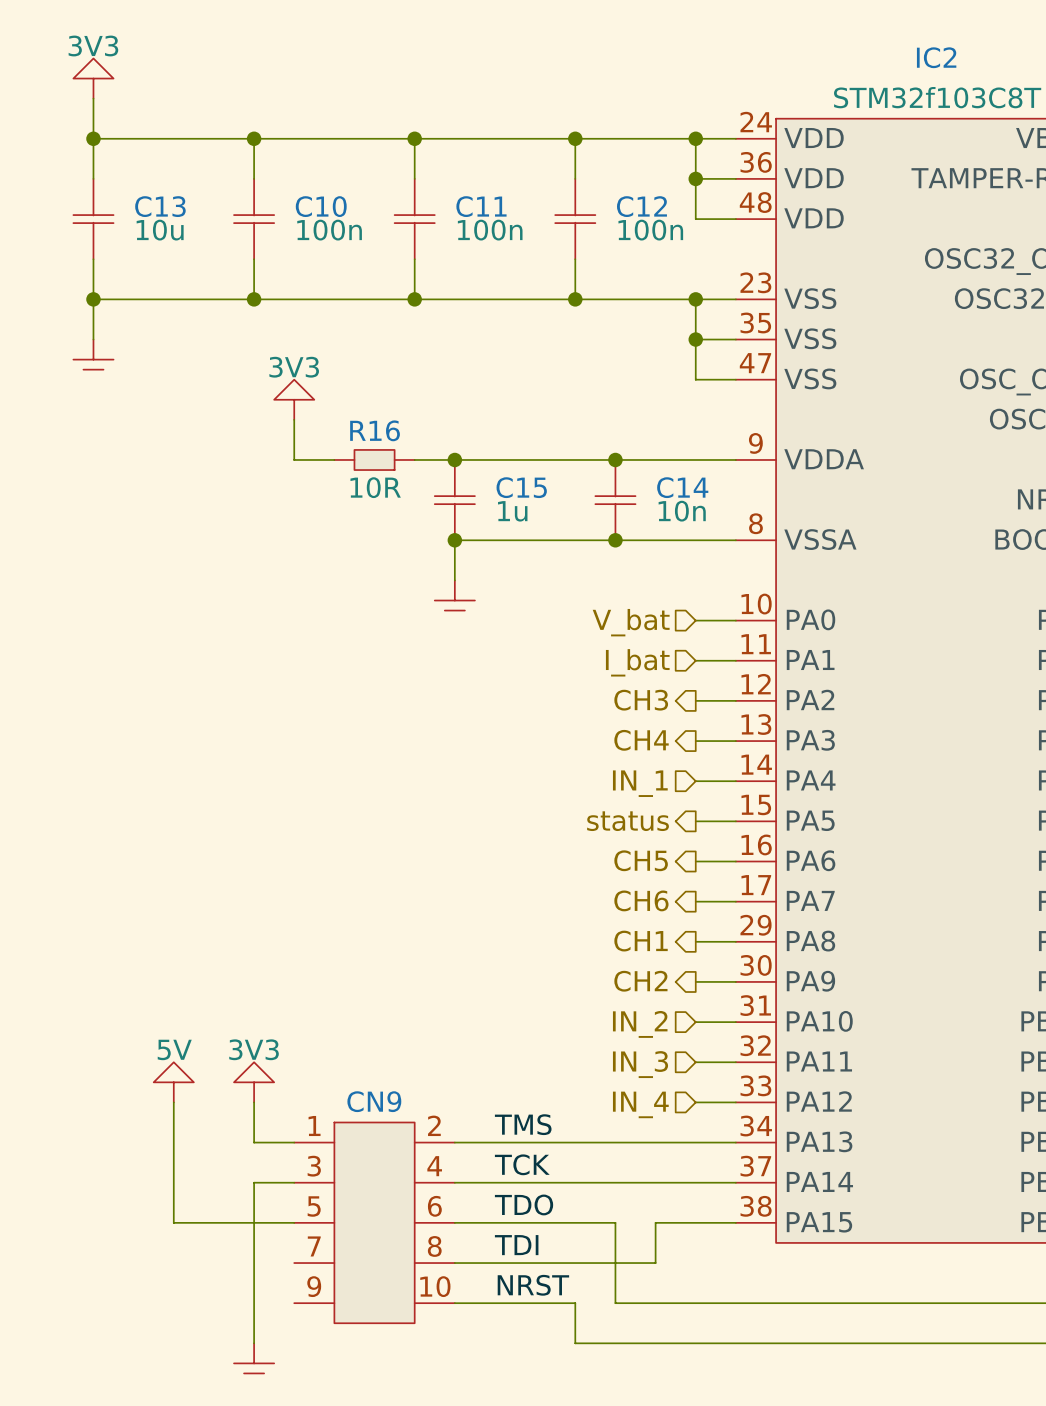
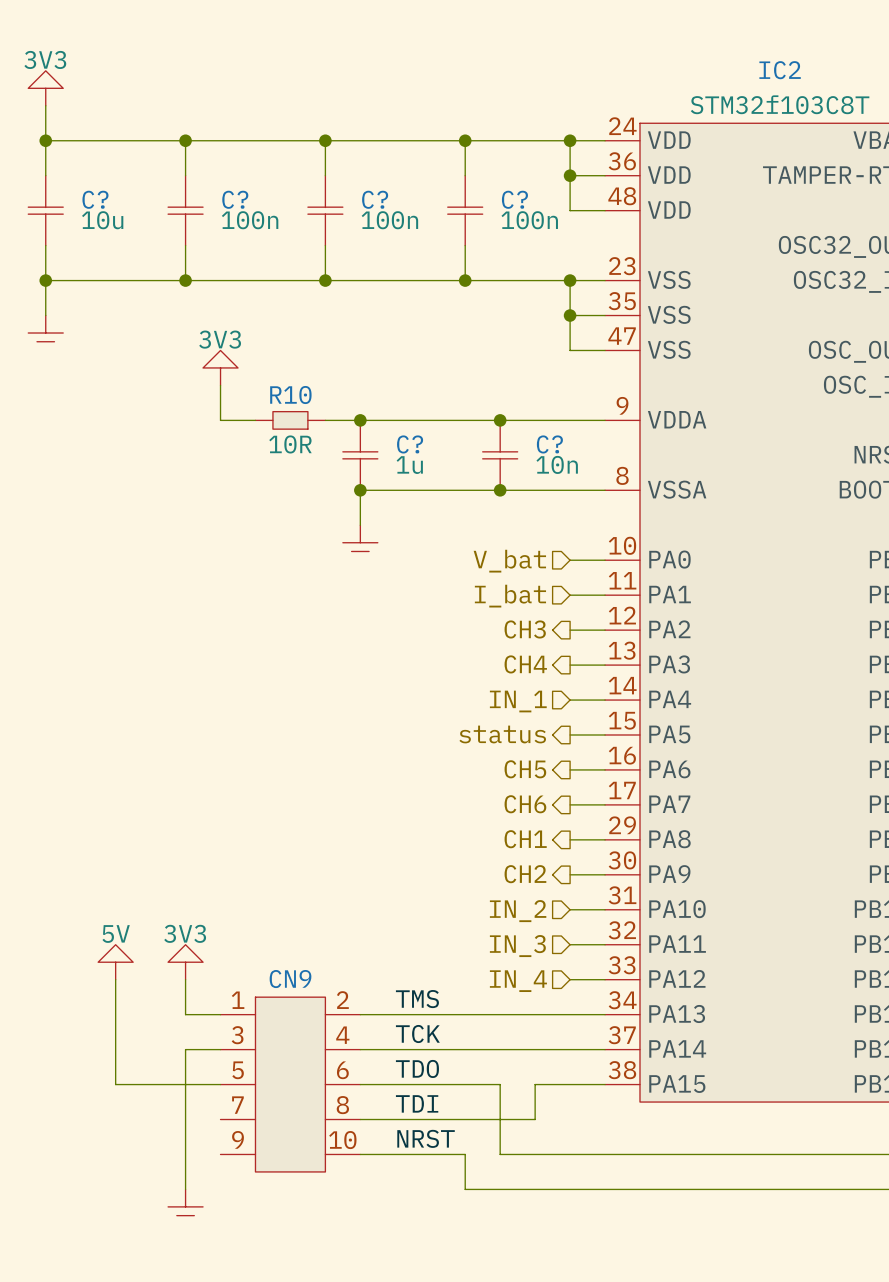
C13 name: C13 (160, 206) -> C? (95, 199)
C10 name: C10 (321, 206) -> C? (235, 199)
C11 name: C11 (481, 206) -> C? (375, 199)
C12 name: C12 (641, 206) -> C? (514, 199)
R16 name: R16 (375, 430) -> R10 (290, 395)
C15 name: C15 (521, 487) -> C? (410, 444)
C14 name: C14 (682, 487) -> C? (549, 444)

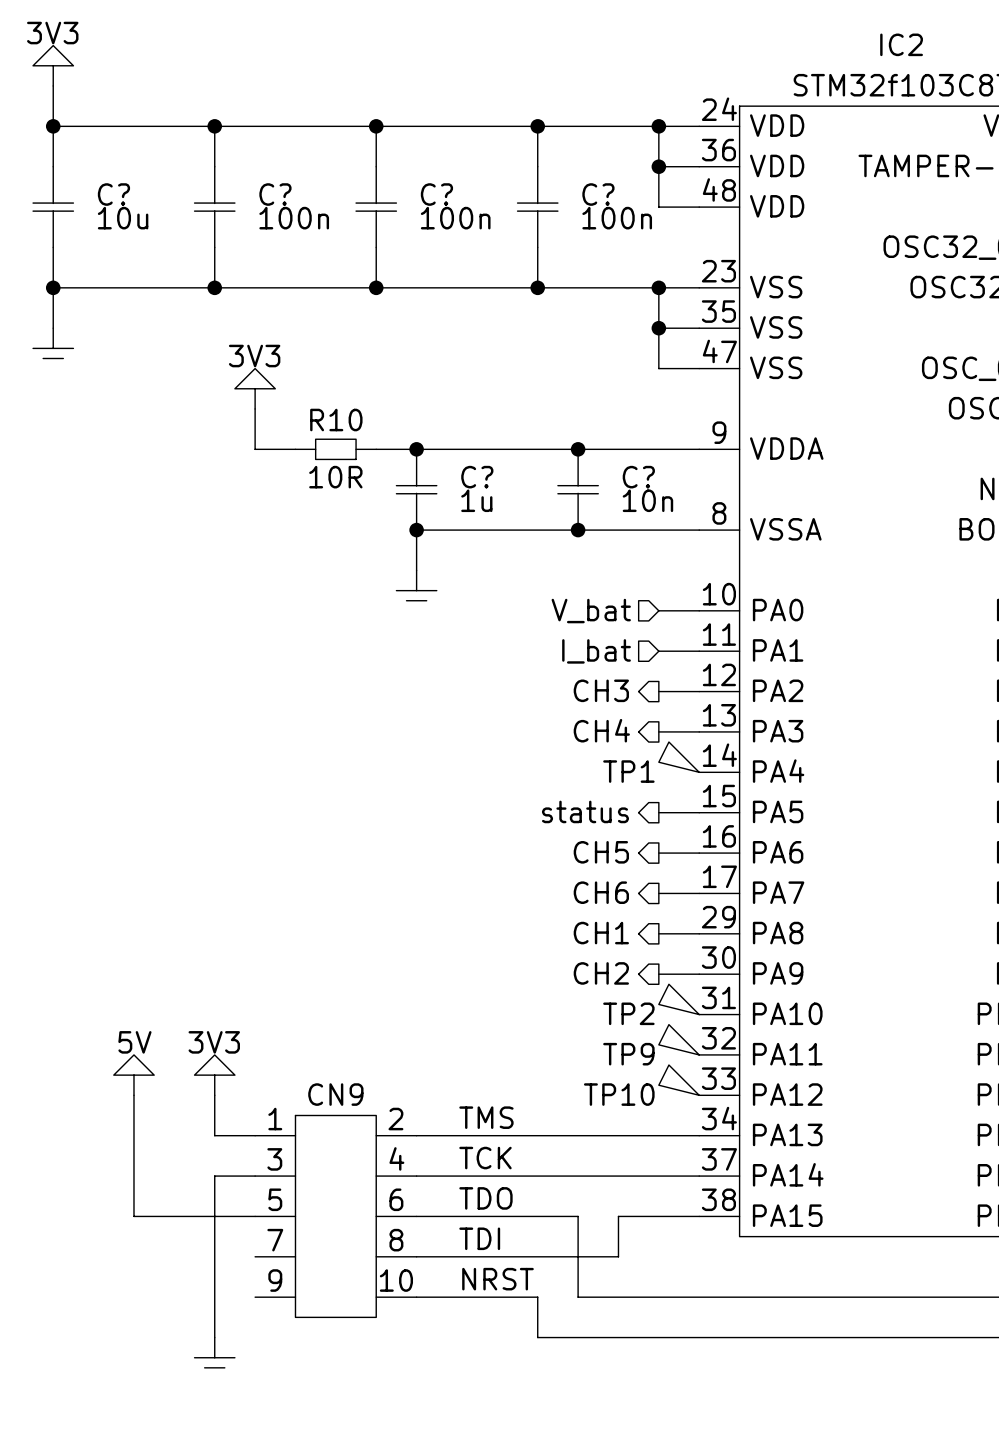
TP1: none -> (679, 757)
wire: (570, 700) (605, 700) -> none
hierarchical label: IN_1 (518, 701) -> none
TP2: none -> (679, 999)
wire: (570, 909) (605, 909) -> none
hierarchical label: IN_2 (518, 911) -> none
TP9: none -> (679, 1039)
wire: (570, 944) (605, 944) -> none
hierarchical label: IN_3 (517, 946) -> none
TP10: none -> (679, 1080)
wire: (570, 979) (605, 979) -> none
hierarchical label: IN_4 (518, 981) -> none

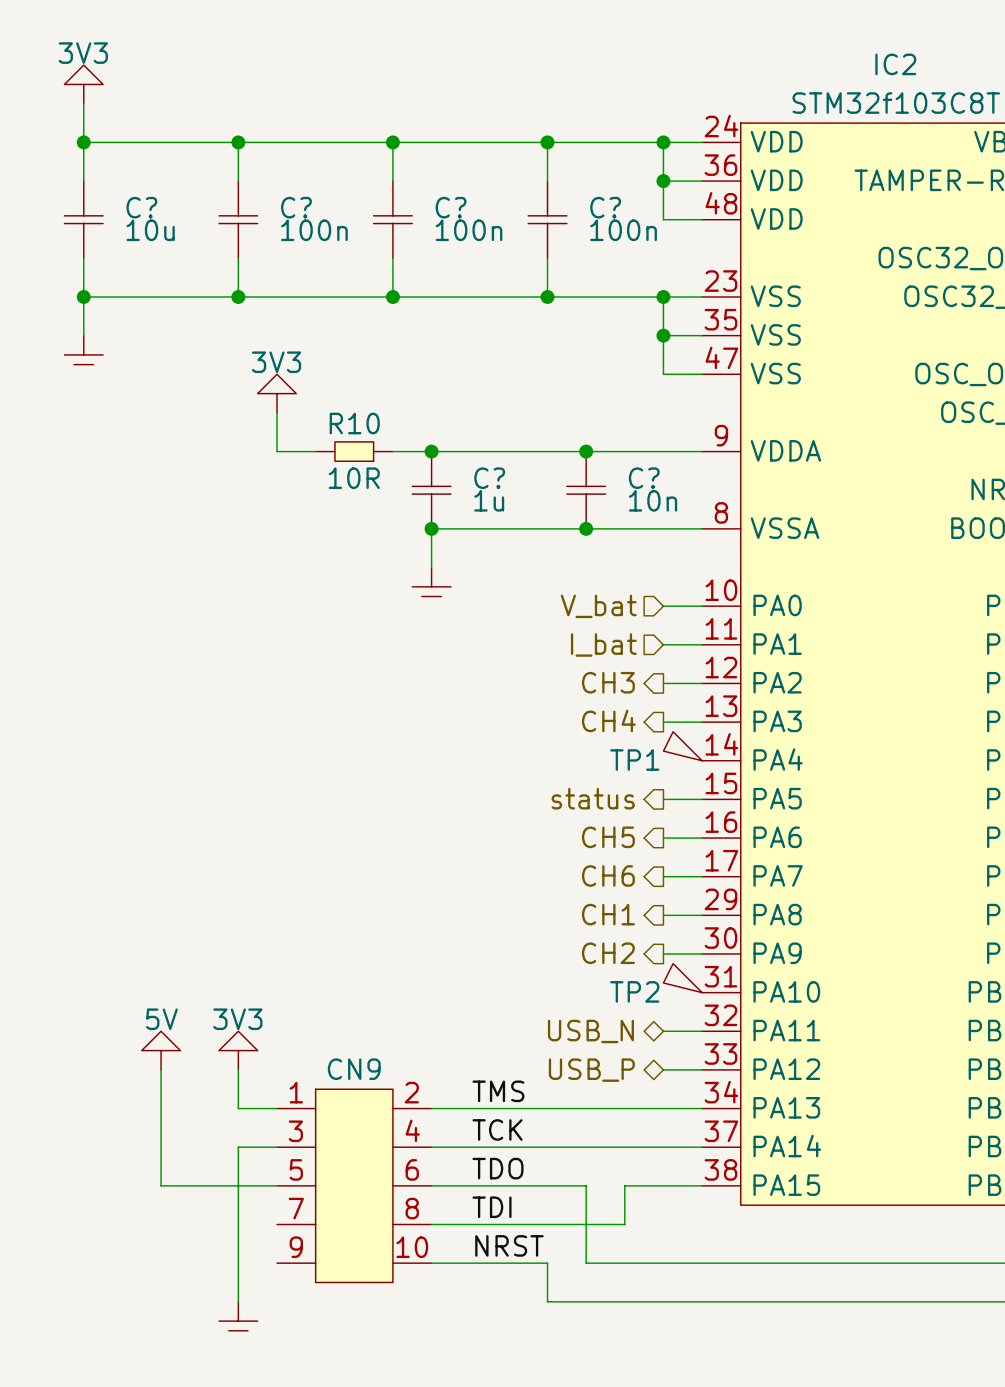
TP9: (679, 1039) -> none
wire: none -> (663, 1031) (702, 1031)
hierarchical label: none -> USB_N (590, 1031)
TP10: (679, 1080) -> none
hierarchical label: none -> USB_P (591, 1070)
wire: none -> (663, 1069) (702, 1069)

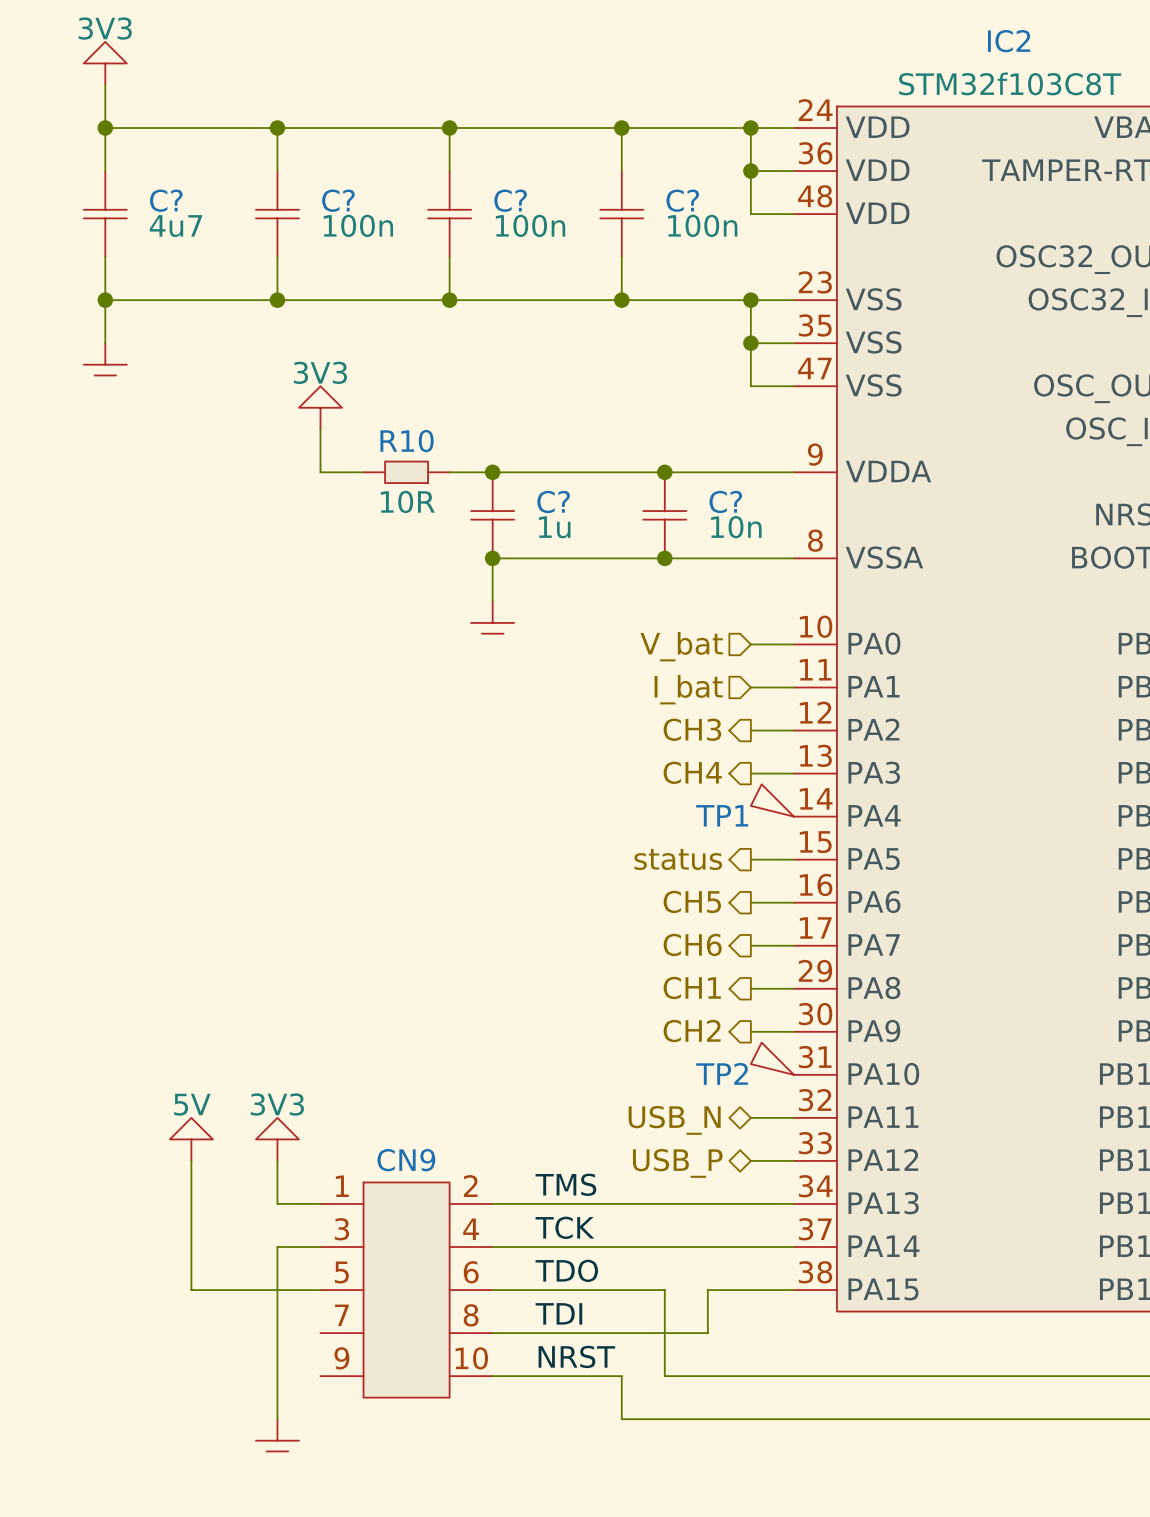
C? value: 10u (150, 230) -> 4u7 (175, 226)

